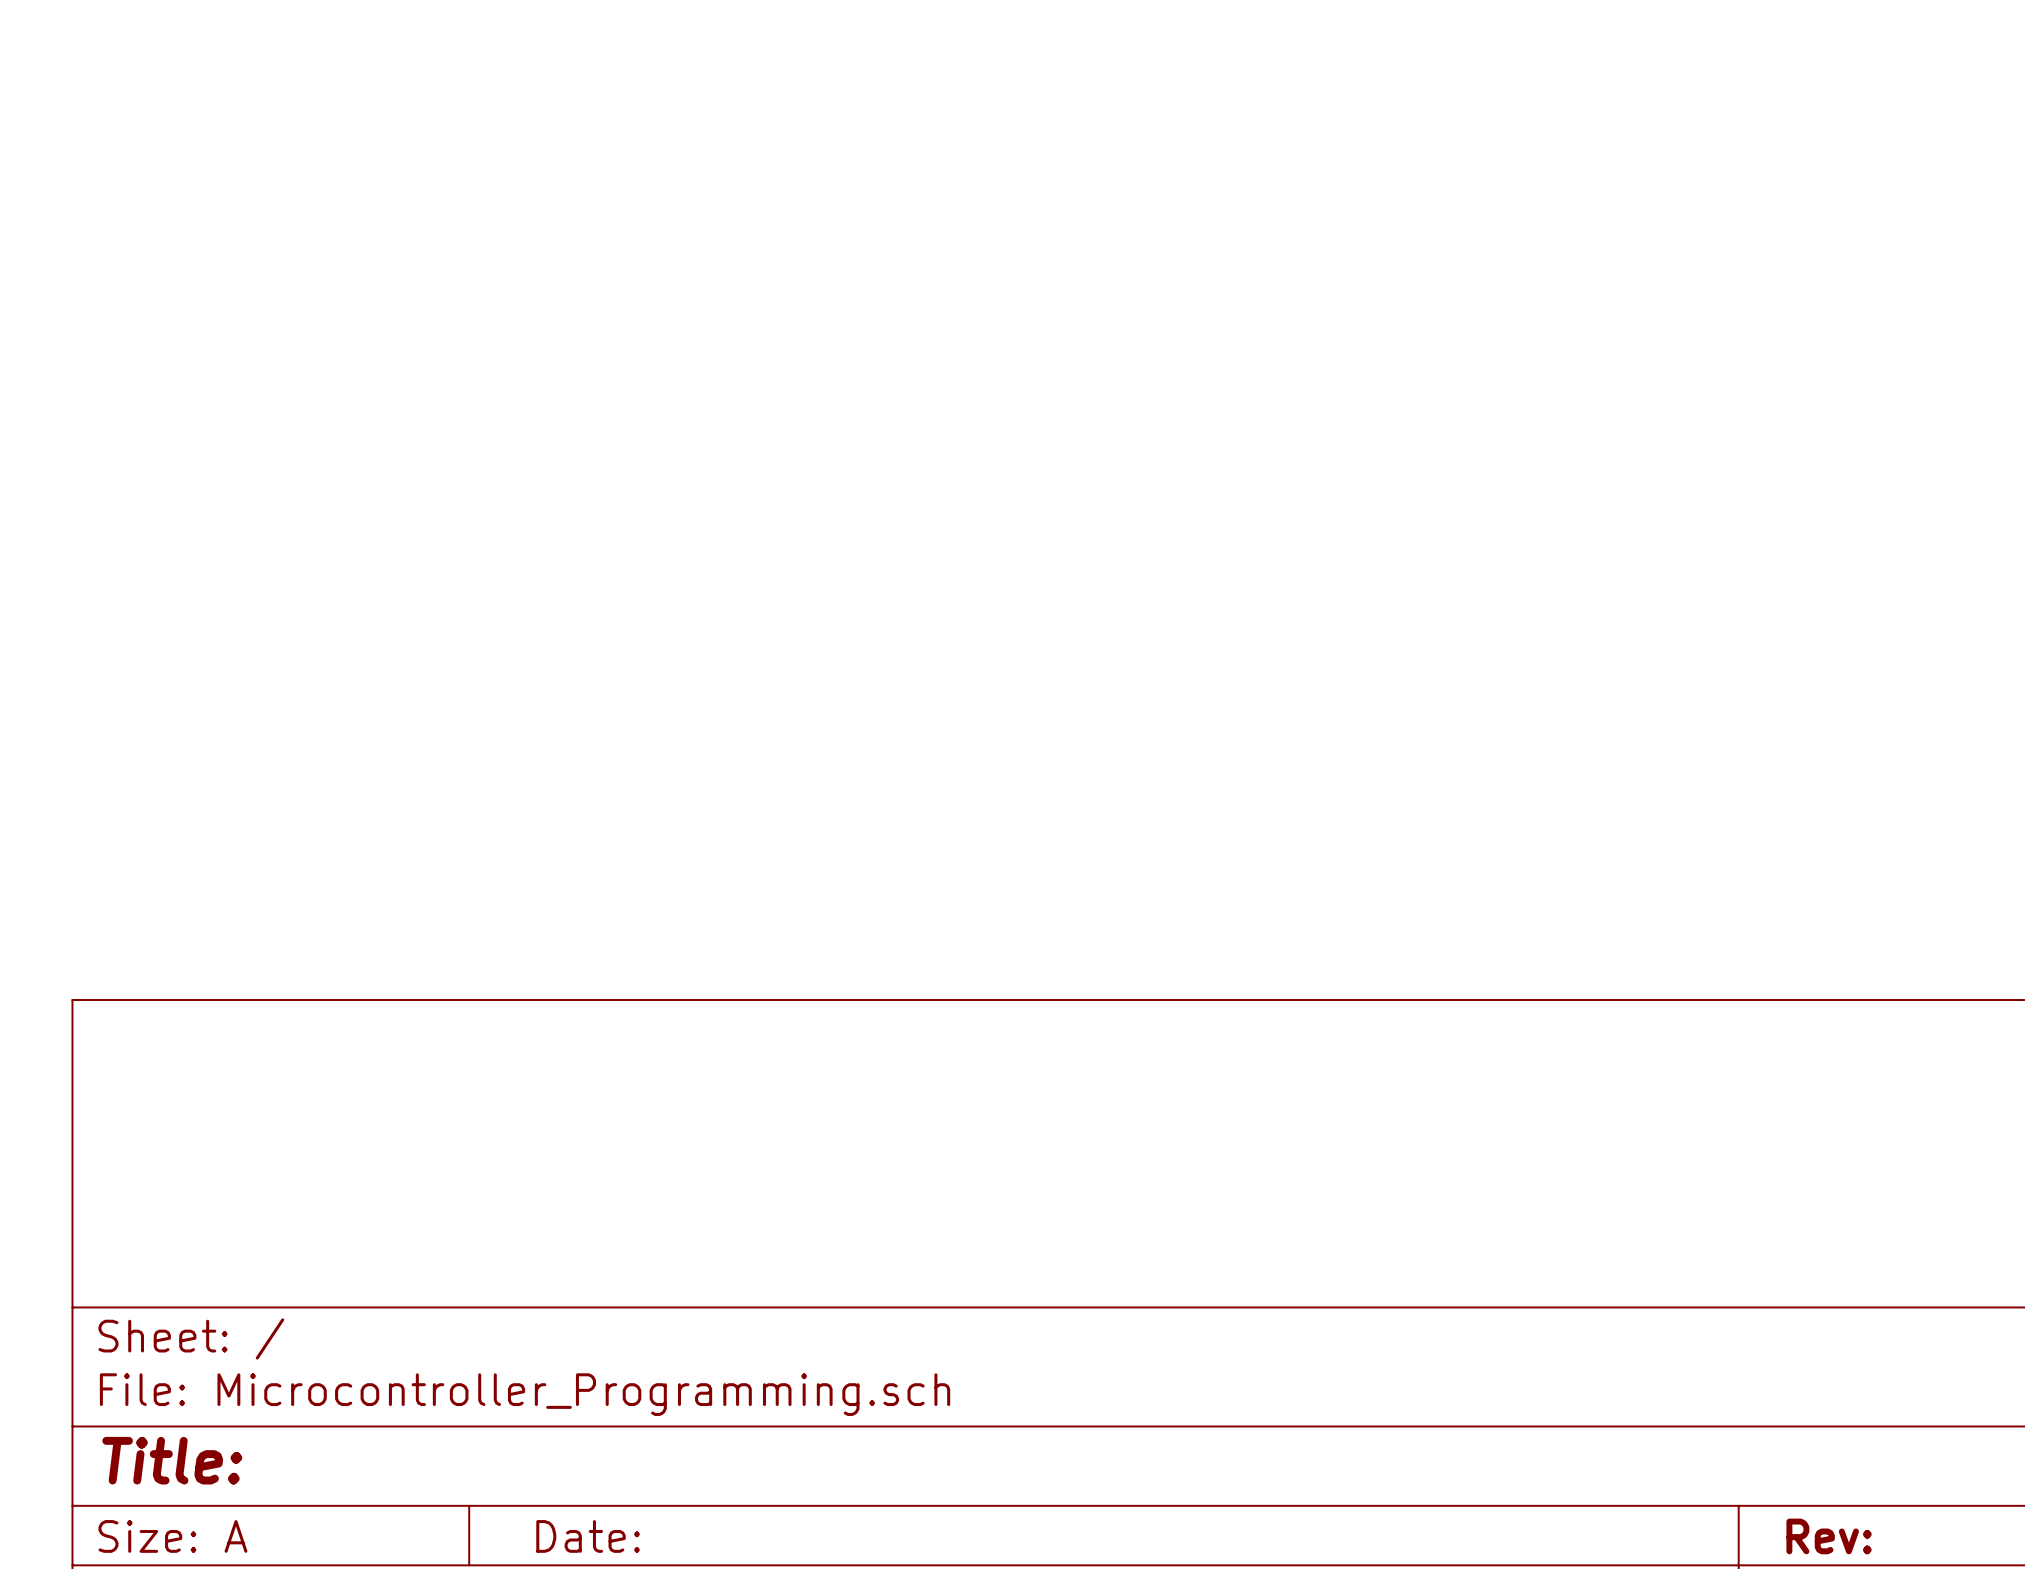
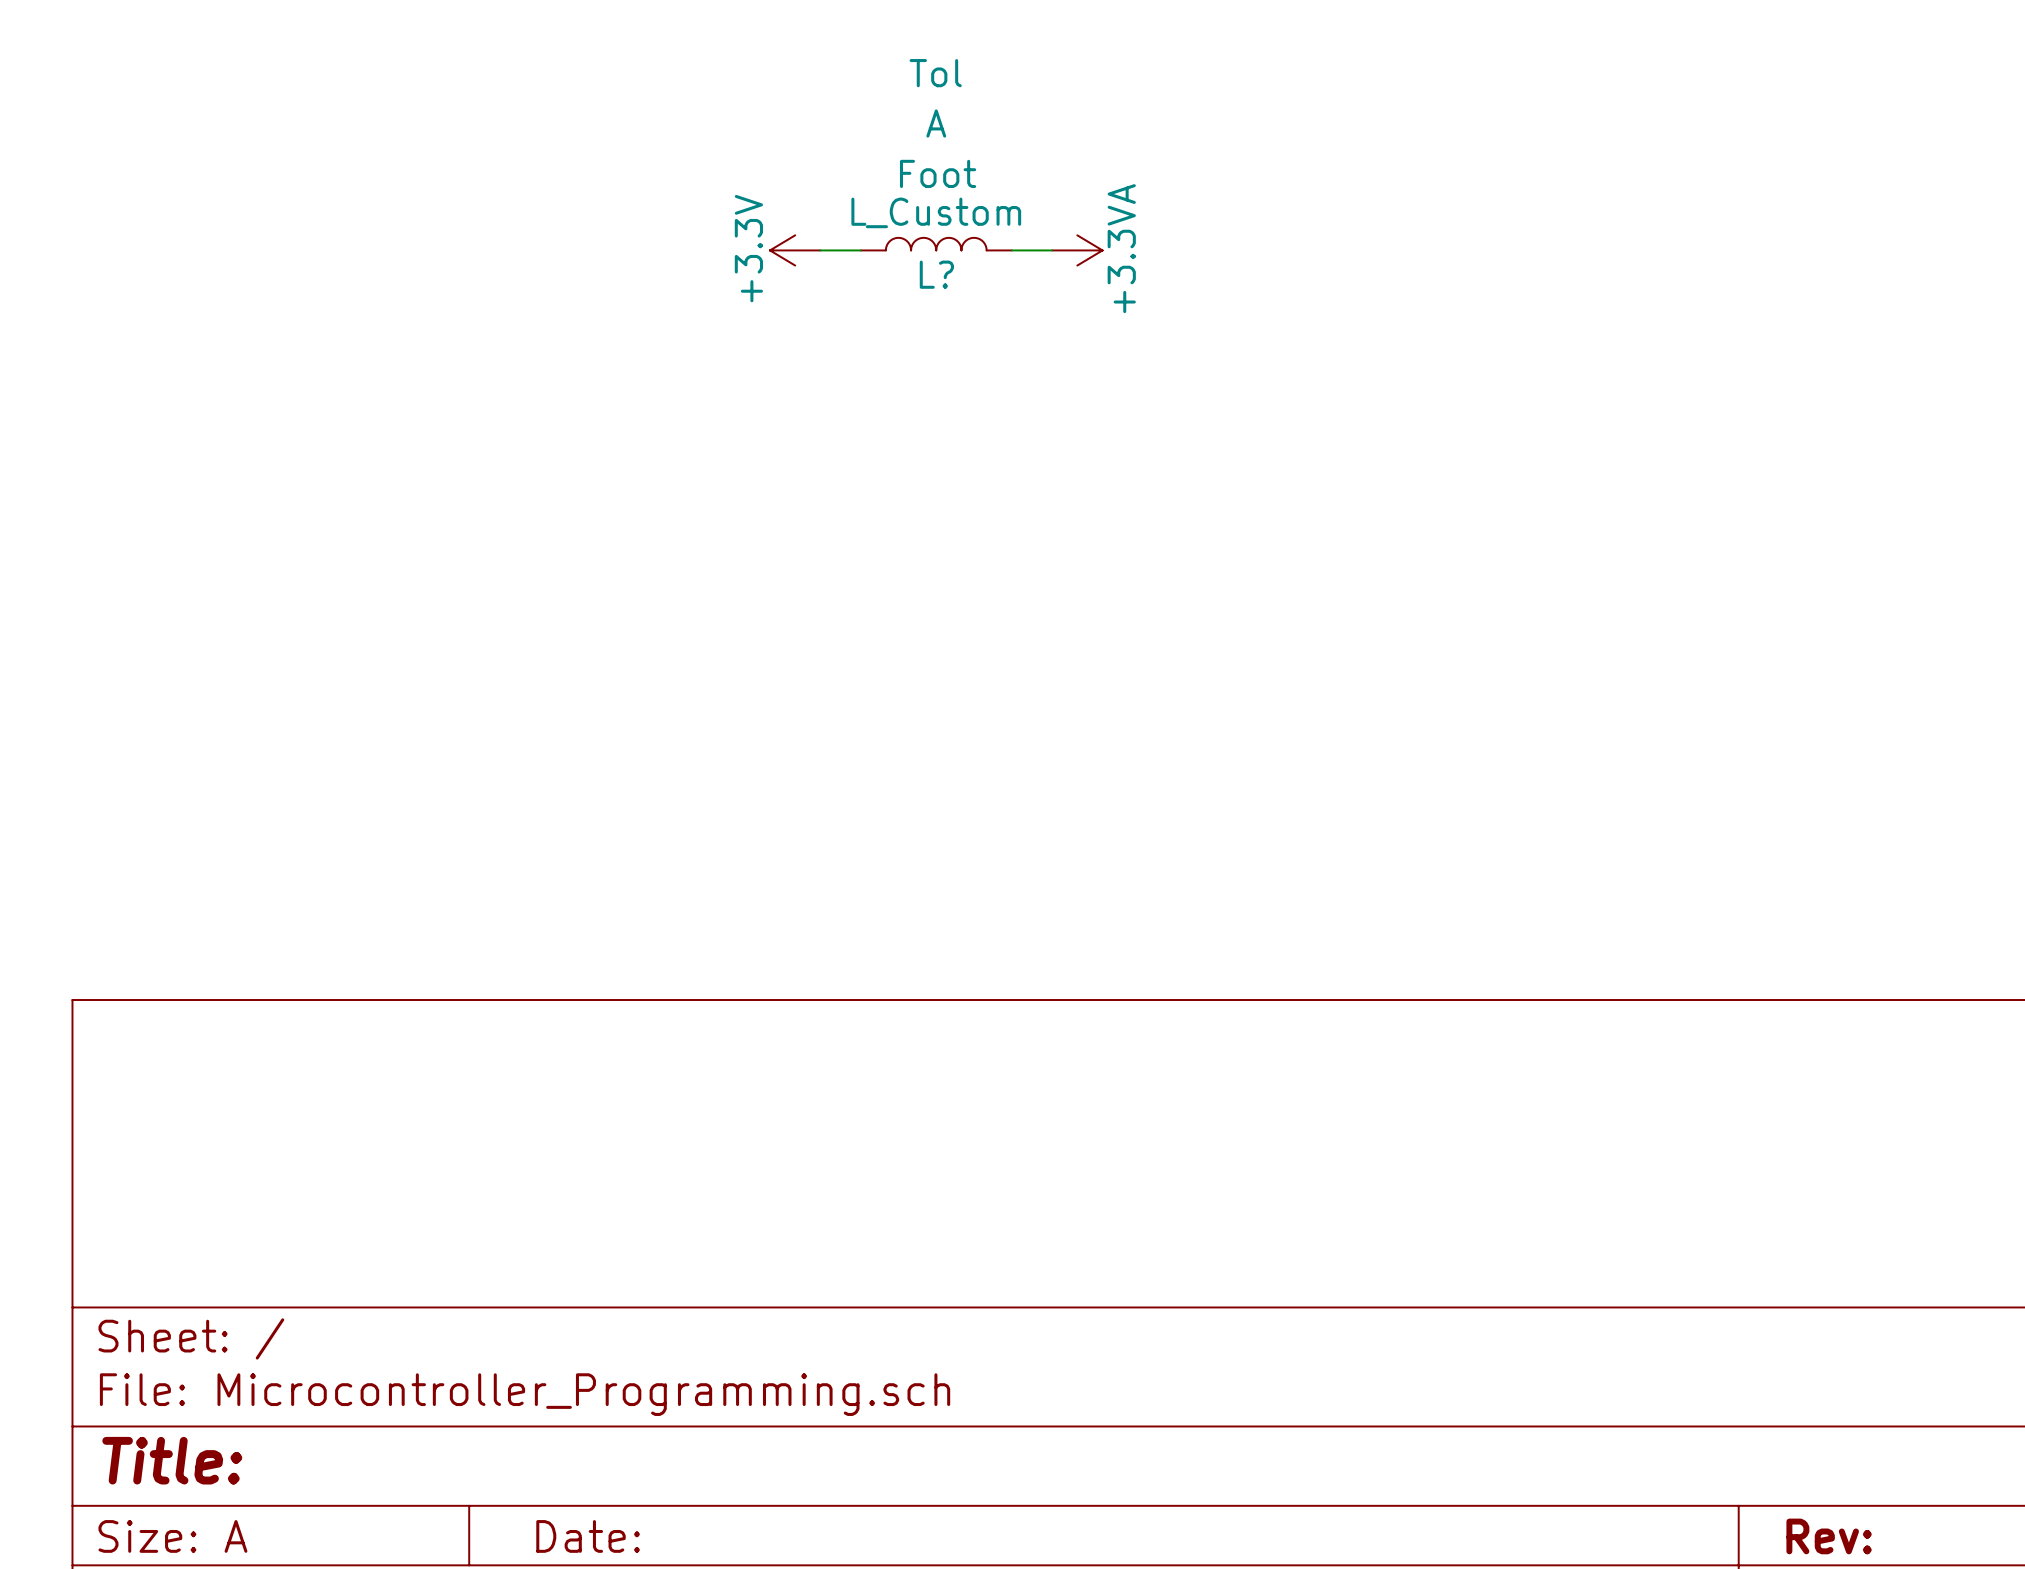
L?: none -> L_Custom (936, 244)
power symbol: none -> +3.3V (795, 250)
wire: none -> (820, 250) (860, 250)
wire: none -> (1011, 250) (1052, 250)
power symbol: none -> +3.3VA (1077, 250)

